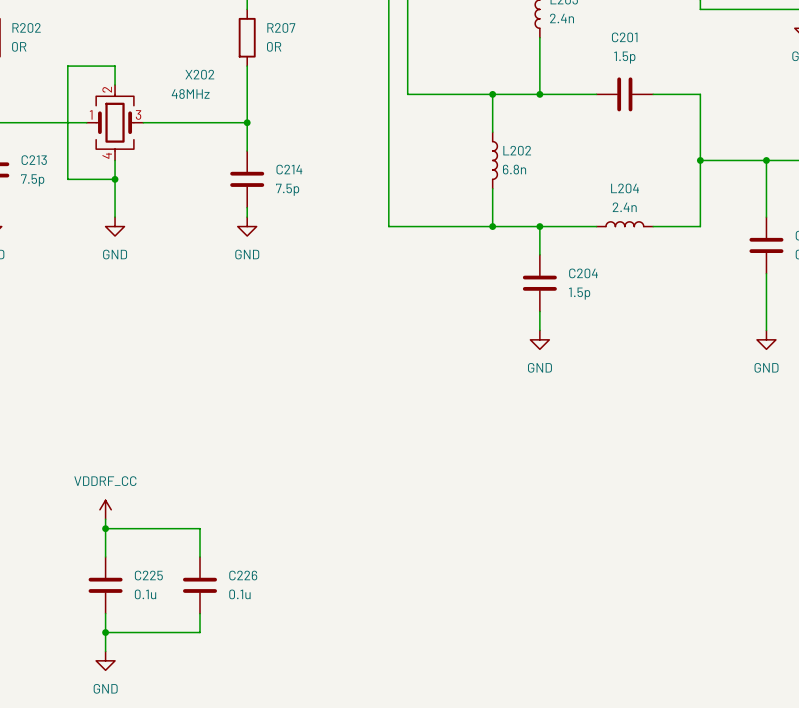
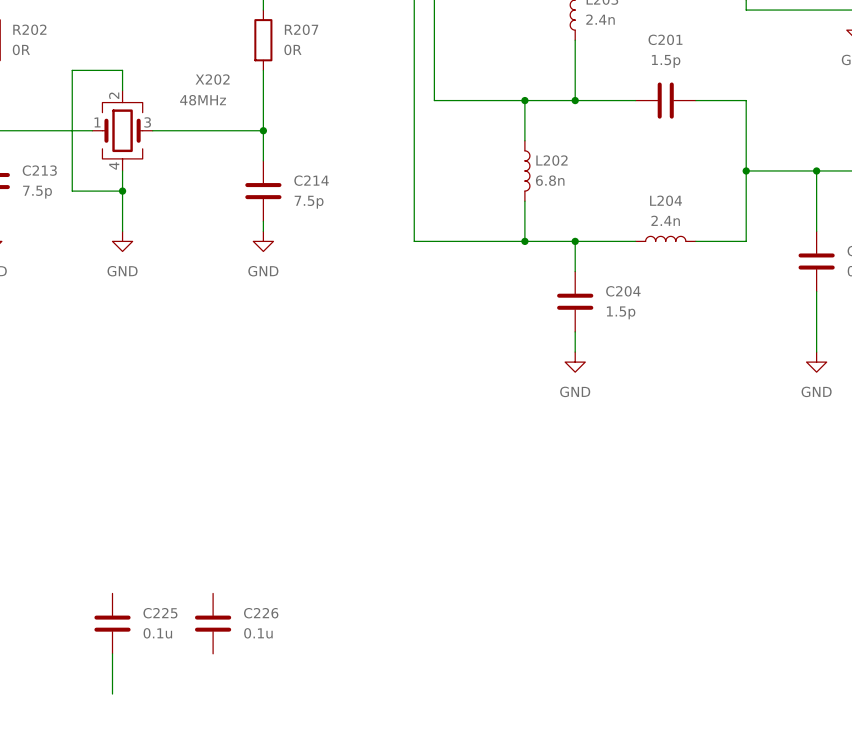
power symbol: VDDRF_CC (105, 509) -> none
wire: (105, 519) (105, 557) -> none
wire: (105, 528) (200, 528) (200, 557) -> none
junction: (105, 528) -> none
wire: (200, 613) (200, 632) (105, 632) -> none
junction: (105, 632) -> none
power symbol: GND (105, 660) -> none

